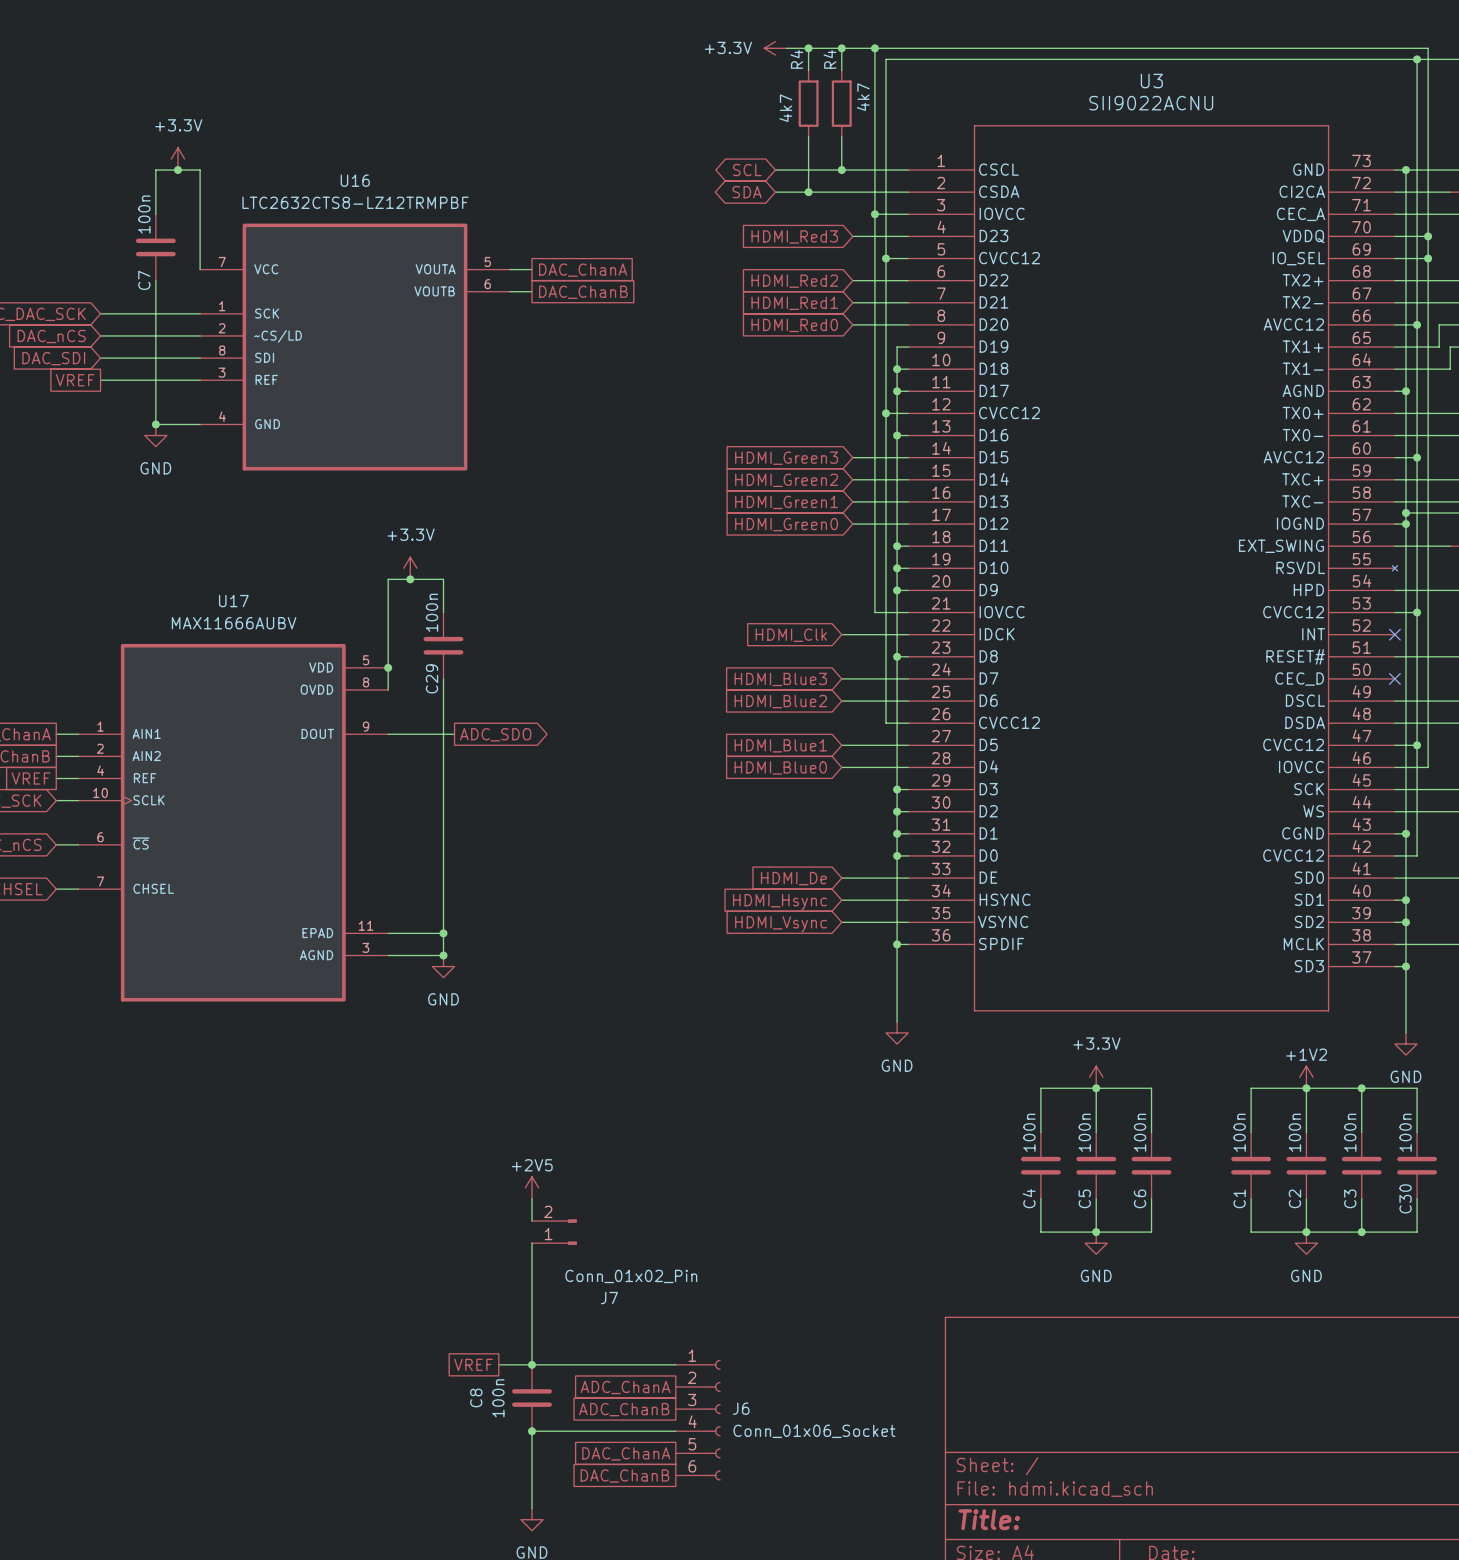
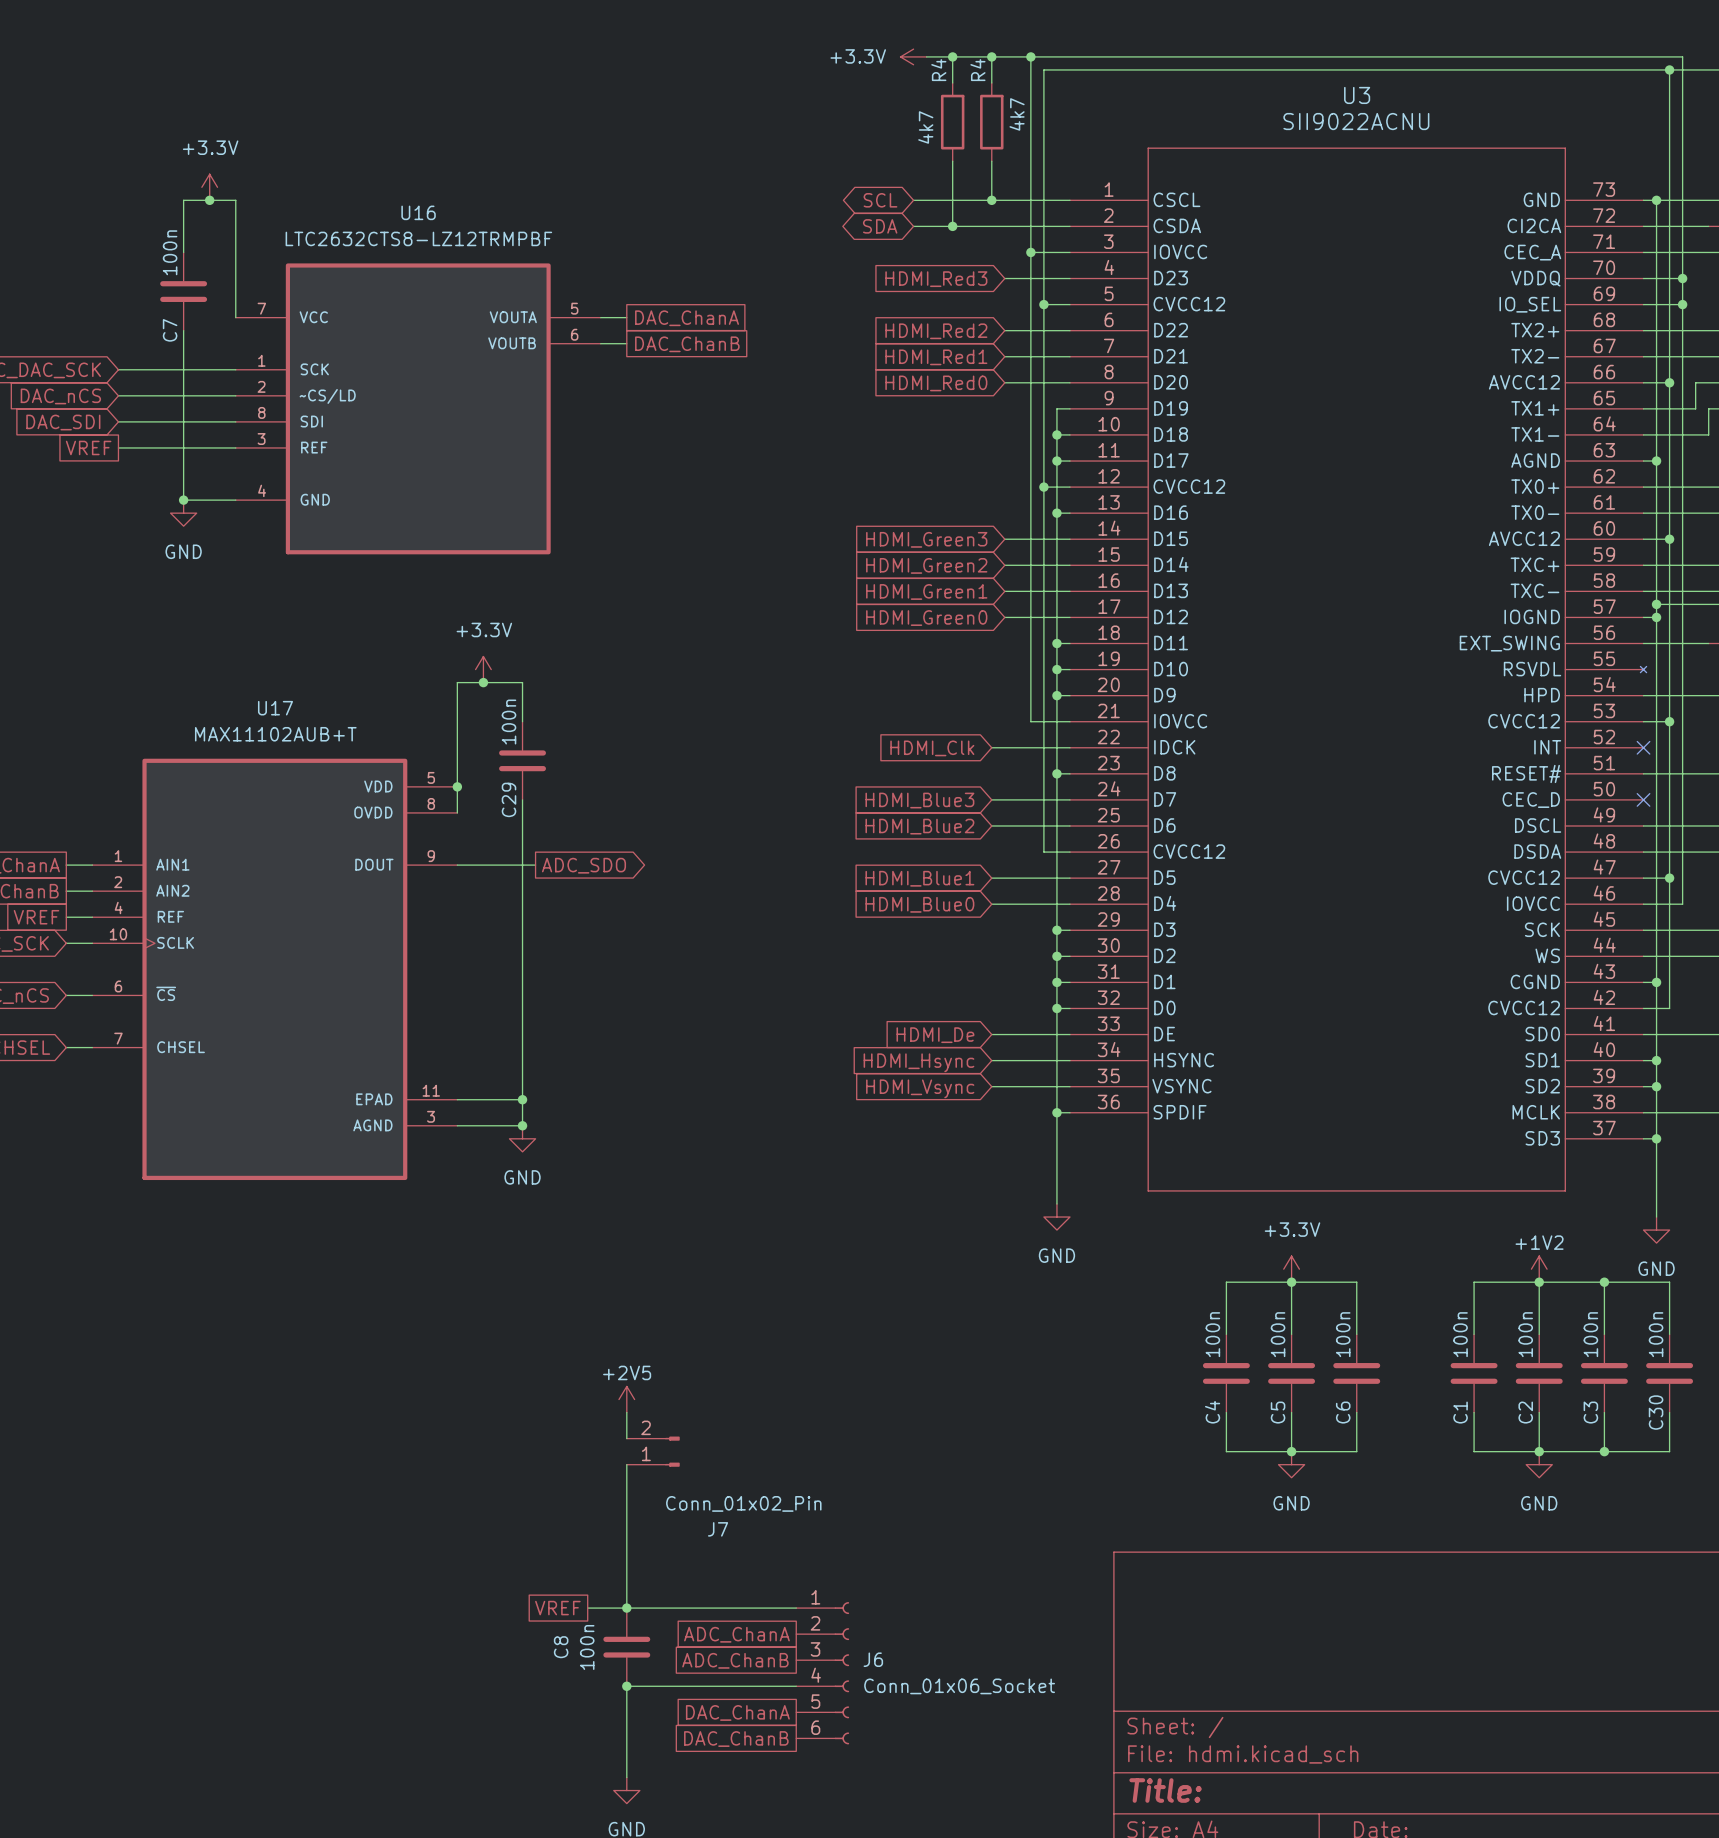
U17 value: MAX11666AUBV (234, 623) -> MAX11102AUB+T (275, 734)

